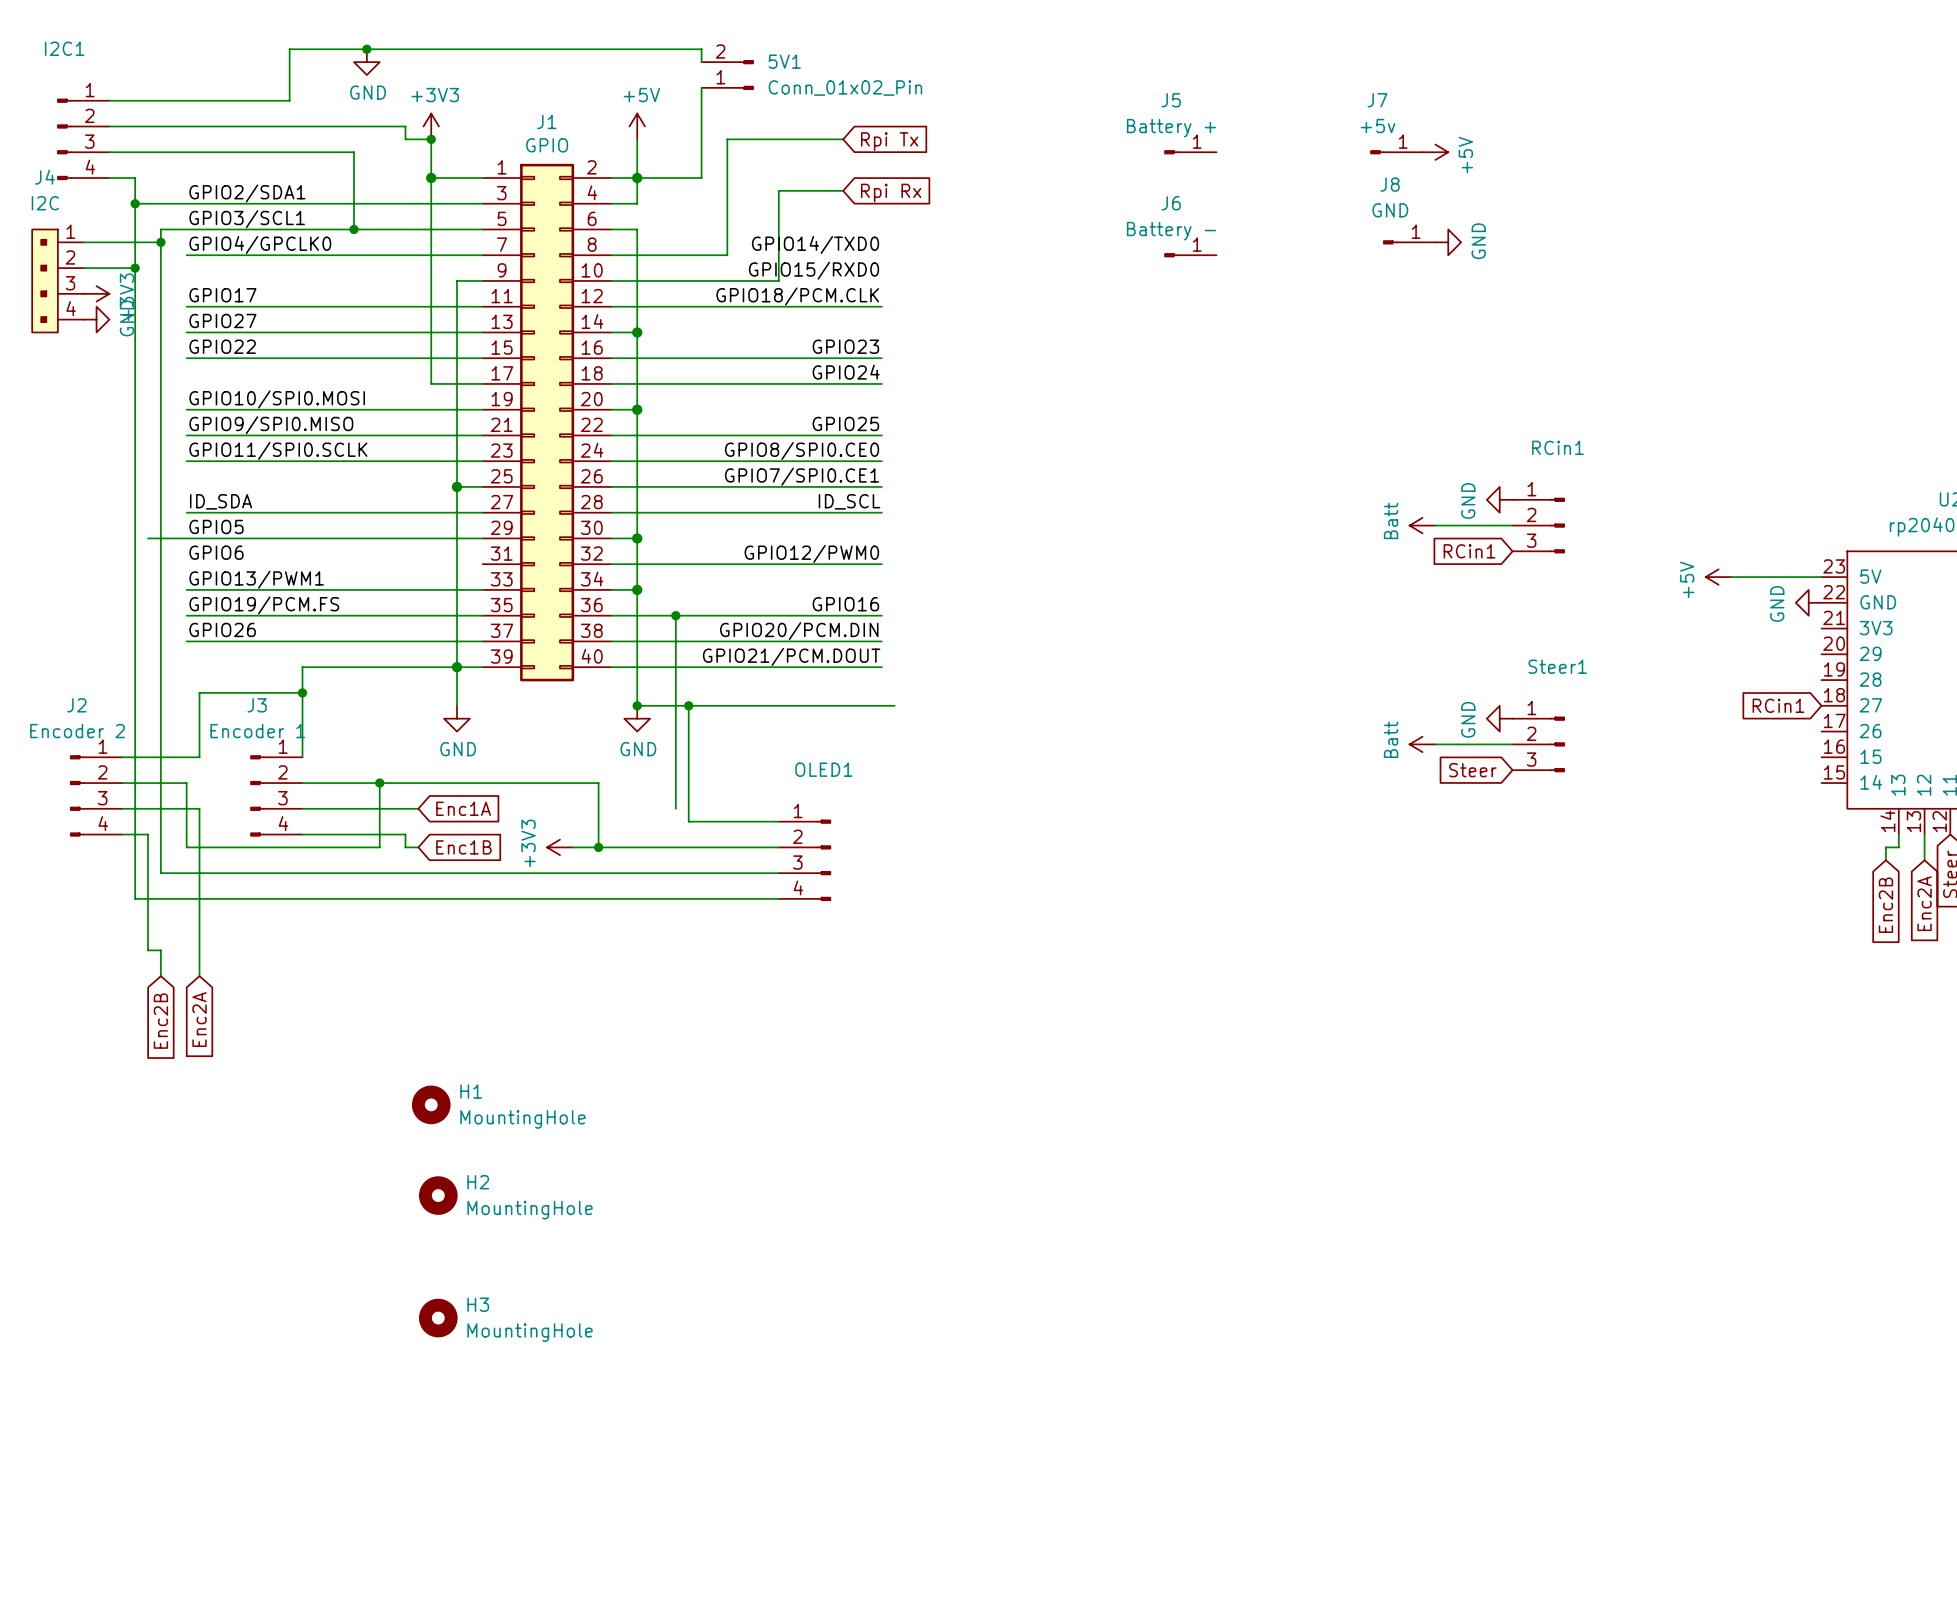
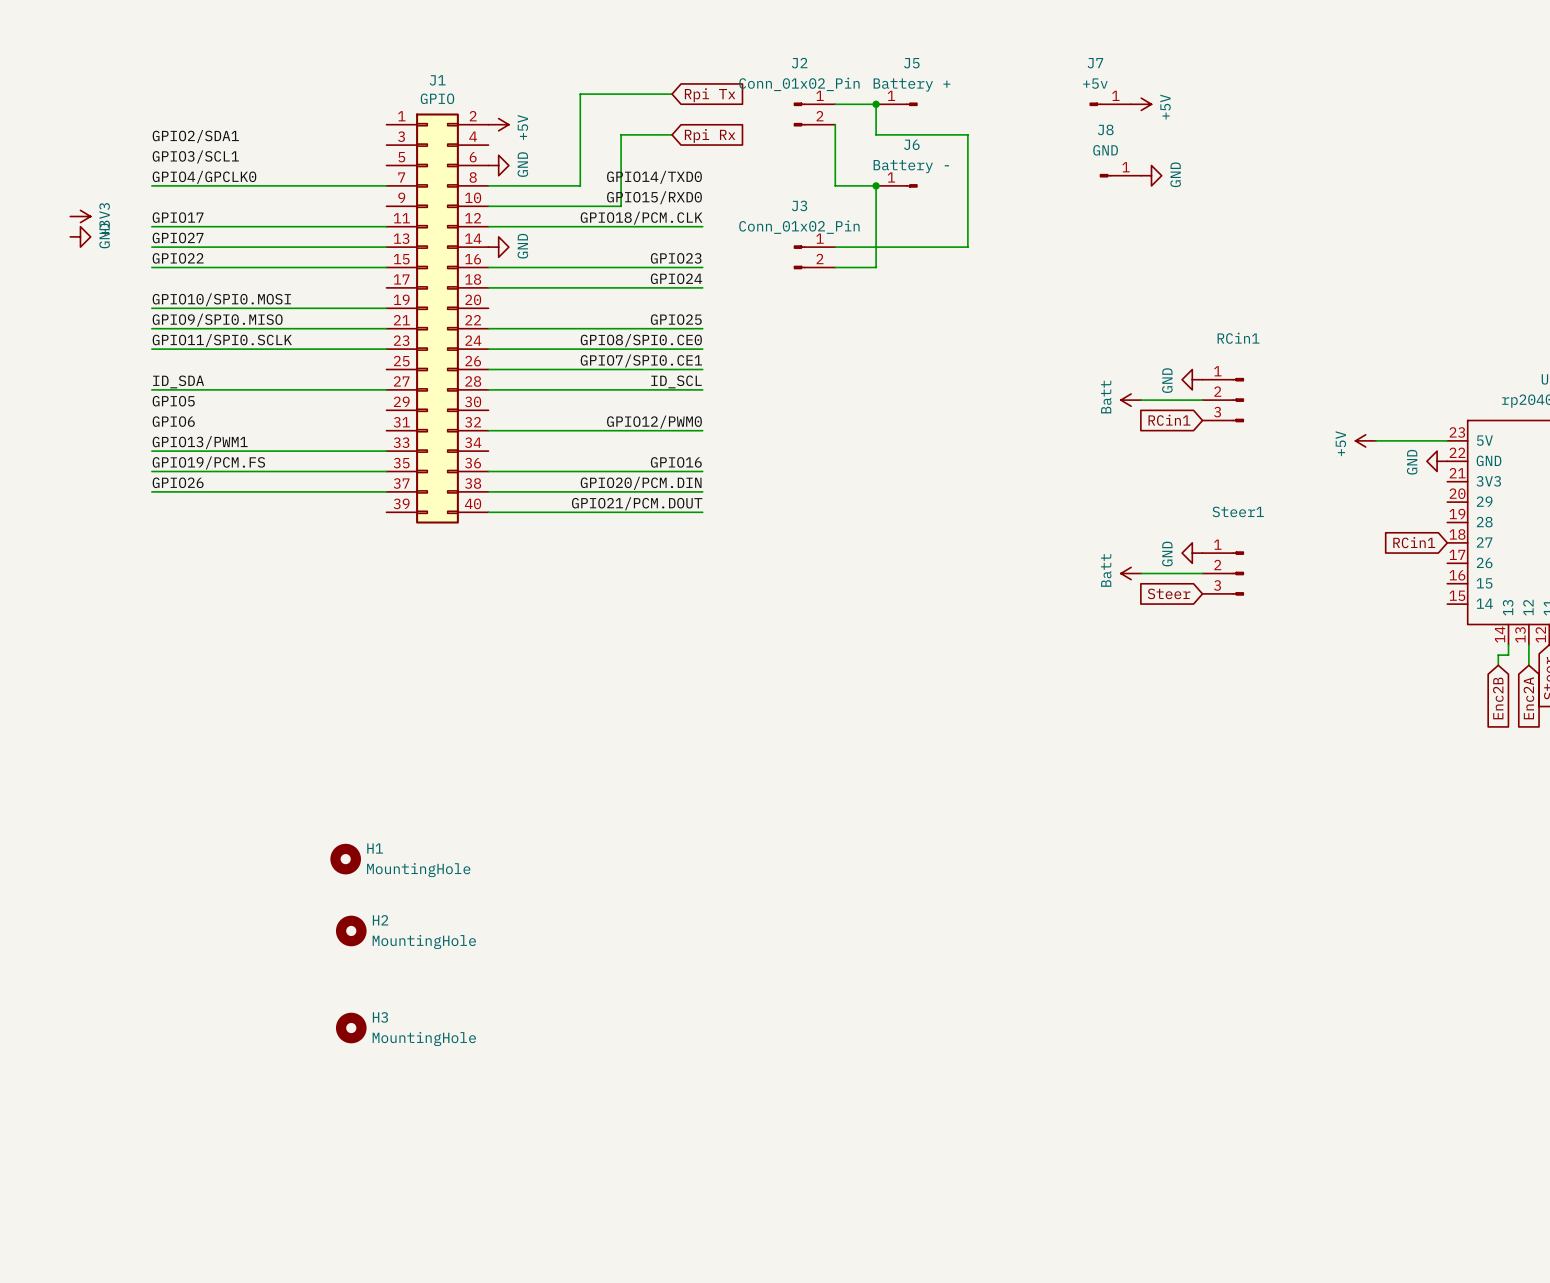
junction: (366, 49) -> none
power symbol: GND (366, 62) -> none
wire: (701, 62) (701, 49) (289, 49) (289, 100) (109, 100) -> none
5V1: Conn_01x02_Pin (727, 75) -> none
wire: (701, 87) (701, 177) (611, 177) -> none
J5 name position: J5 (1171, 100) -> J5 (911, 63)
wire: (109, 126) (405, 126) (405, 139) (431, 139) (431, 383) (482, 383) -> none
power symbol: +3V3 (431, 126) -> none
power symbol rotation: 0° (637, 126) -> 90° clockwise (498, 124)
power symbol position: +5V (637, 126) -> +5V (498, 124)
J5 value position: Battery + (1171, 128) -> Battery + (911, 84)
I2C1: (83, 139) -> none
junction: (431, 139) -> none
wire: (637, 139) (637, 203) (611, 203) -> none
wire: (109, 152) (354, 152) (354, 229) -> none
wire: none -> (835, 104) (876, 104) (876, 134) (967, 134) (967, 247) (835, 247)
junction: none -> (876, 104)
J5 rotation: 0° (1171, 152) -> 180° (911, 104)
J5 position: (1190, 152) -> (896, 104)
wire: (109, 177) (135, 177) (135, 898) (778, 898) -> none
wire: (431, 177) (482, 177) -> none
junction: (431, 177) -> none
junction: (637, 177) -> none
wire: none -> (835, 124) (835, 185) (876, 185) (876, 267) (835, 267)
wire: (135, 203) (482, 203) -> none
junction: (135, 203) -> none
J6 name position: J6 (1171, 203) -> J6 (911, 144)
junction: (354, 229) -> none
wire: (482, 229) (160, 229) (160, 873) (778, 873) -> none
wire: (611, 229) (637, 229) (637, 705) (894, 705) -> none
power symbol: none -> GND (498, 165)
J6 value position: Battery - (1171, 231) -> Battery - (911, 166)
wire: (83, 242) (160, 242) -> none
junction: (160, 242) -> none
junction: none -> (876, 185)
J6 rotation: 0° (1171, 255) -> 180° (911, 185)
J6 position: (1190, 255) -> (896, 185)
wire: (83, 268) (135, 268) -> none
junction: (135, 268) -> none
J4: I2C (57, 280) -> none
wire: (482, 280) (456, 280) (456, 705) -> none
power symbol: none -> GND (498, 247)
junction: (637, 332) -> none
wire: (611, 409) (637, 409) -> none
junction: (637, 409) -> none
wire: (456, 486) (482, 486) -> none
junction: (456, 486) -> none
wire: (148, 538) (482, 538) -> none
wire: (611, 538) (637, 538) -> none
junction: (637, 538) -> none
wire: (611, 589) (637, 589) -> none
junction: (637, 589) -> none
wire: (675, 615) (675, 808) -> none
junction: (675, 615) -> none
junction: (456, 667) -> none
wire: (482, 667) (302, 667) (302, 757) -> none
wire: (302, 692) (199, 692) (199, 757) (122, 757) -> none
junction: (302, 692) -> none
J2 name position: J2 (76, 705) -> J2 (799, 63)
J3 name position: J3 (257, 705) -> J3 (799, 205)
junction: (637, 705) -> none
wire: (688, 705) (688, 821) (778, 821) -> none
junction: (688, 705) -> none
power symbol: GND (456, 718) -> none
power symbol: GND (637, 718) -> none
J2 value: Encoder 2 (77, 731) -> Conn_01x02_Pin (799, 84)
J3 value: Encoder 1 (257, 731) -> Conn_01x02_Pin (799, 227)
J2 symbol: [70, 755, 123, 837] -> [793, 102, 836, 127]
J3 symbol: [250, 755, 303, 837] -> [793, 245, 836, 270]
wire: (122, 783) (186, 783) (186, 847) (379, 847) (379, 783) -> none
wire: (302, 783) (598, 783) (598, 847) -> none
junction: (379, 783) -> none
wire: (122, 808) (199, 808) (199, 976) -> none
wire: (302, 808) (418, 808) -> none
global label: Enc1A (463, 808) -> none
wire: (122, 834) (148, 834) (148, 950) (160, 950) (160, 976) -> none
wire: (302, 834) (405, 834) (405, 847) (418, 847) -> none
global label: Enc1B (463, 847) -> none
power symbol: +3V3 (559, 847) -> none
wire: (572, 847) (778, 847) -> none
junction: (598, 847) -> none
OLED1: (804, 860) -> none
global label: Enc2A (199, 1019) -> none
global label: Enc2B (160, 1021) -> none

